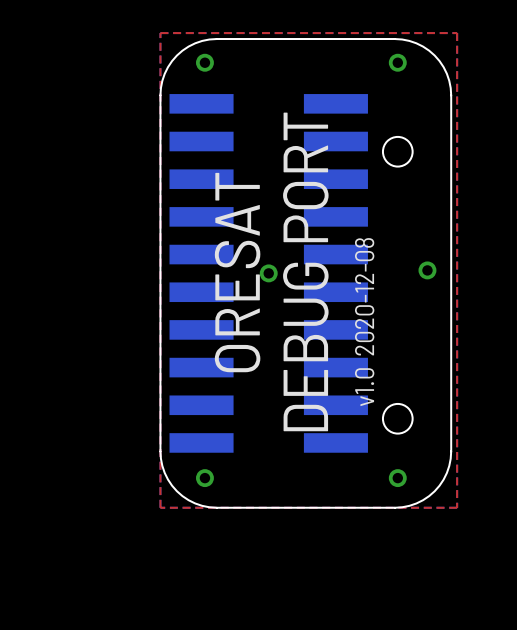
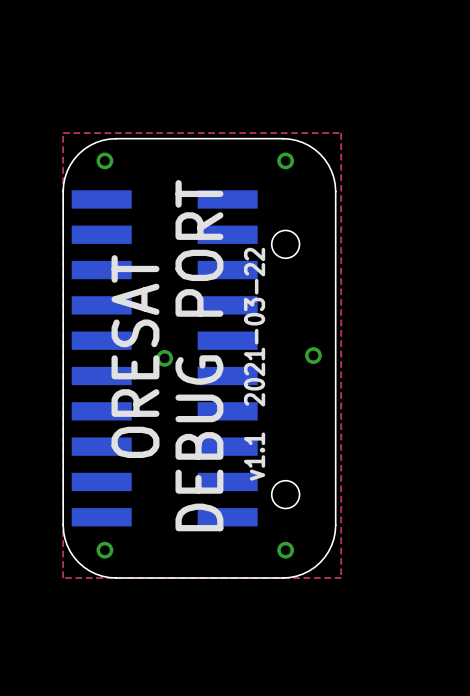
text: v1.0 2020-12-08 (364, 322) -> v1.1 2021-03-22 (254, 364)

